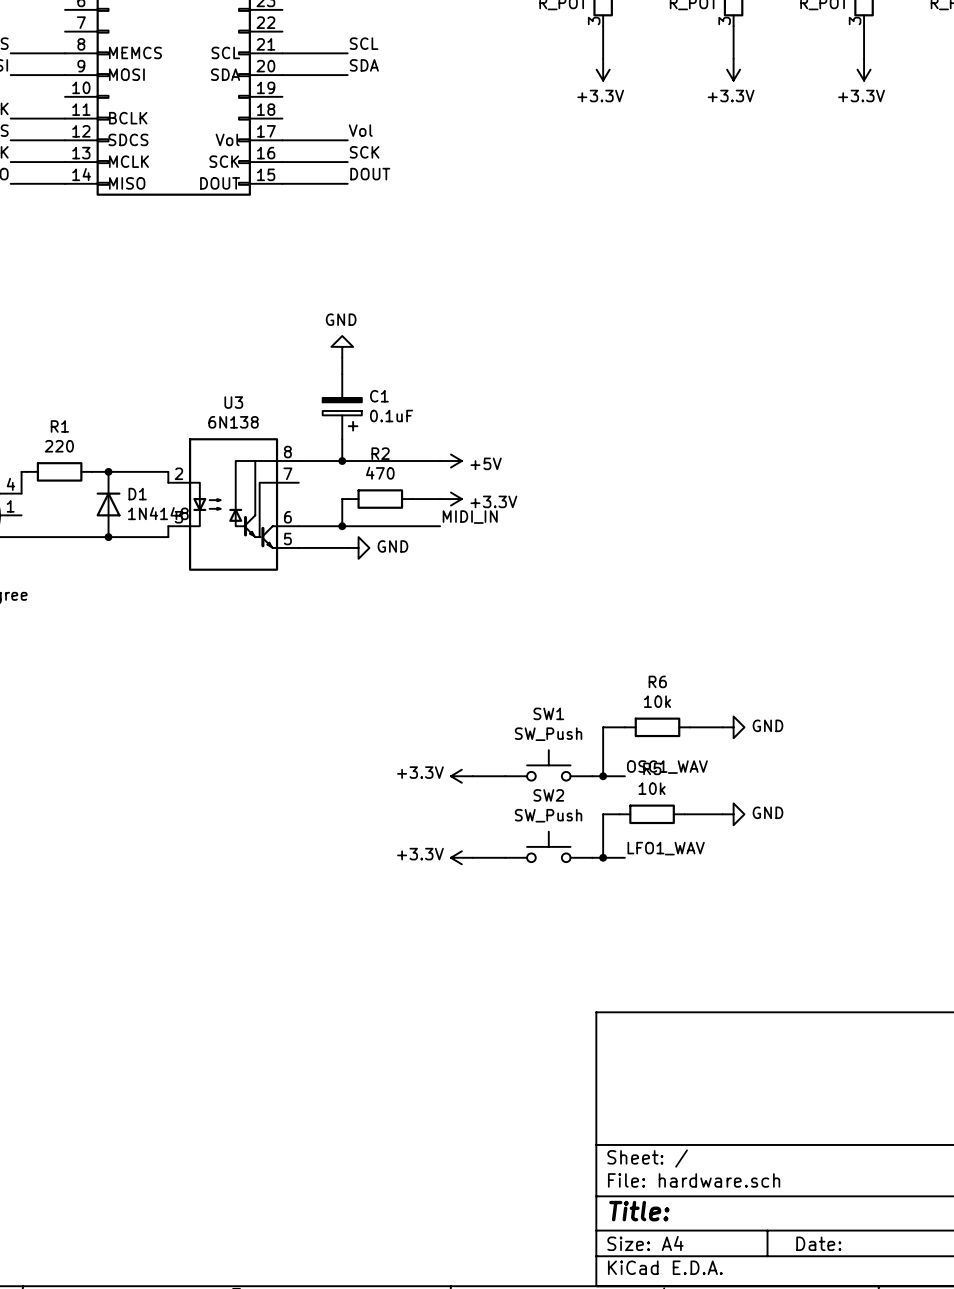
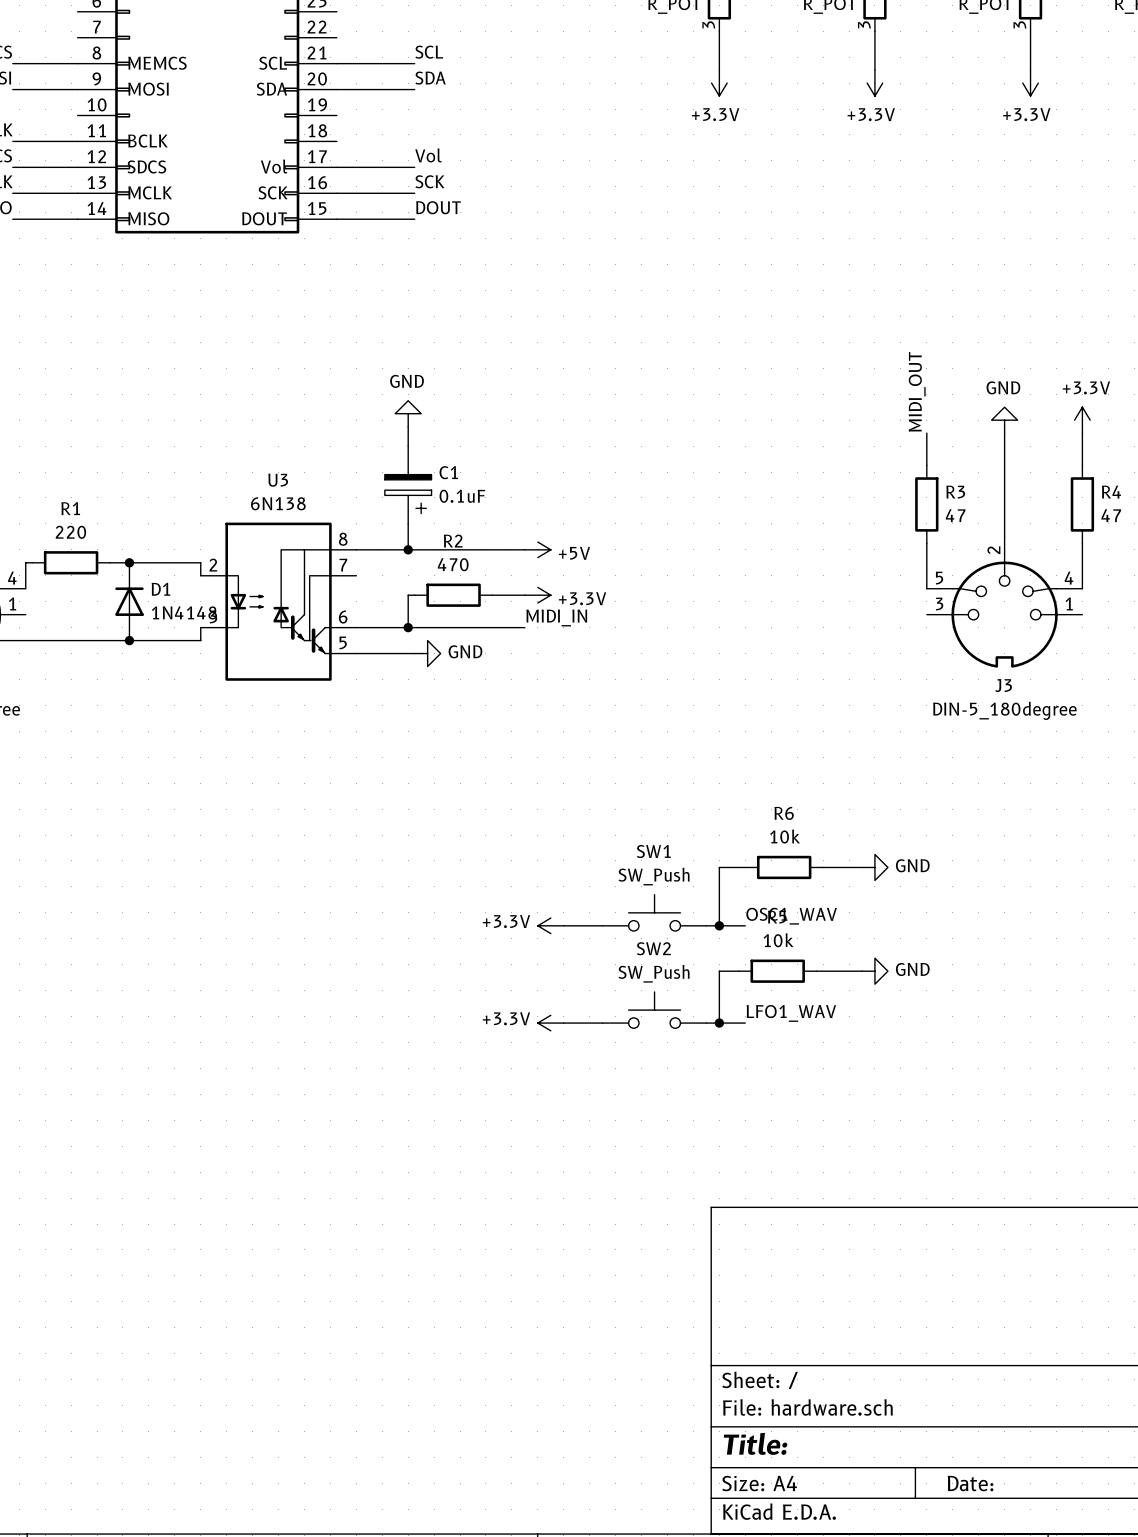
label: none -> MIDI_OUT (917, 391)
power symbol: none -> GND (1004, 420)
power symbol: none -> +3.3V (1082, 420)
wire: none -> (926, 433) (926, 465)
wire: none -> (1004, 433) (1004, 536)
wire: none -> (1082, 433) (1082, 465)
R3: none -> 47 (926, 504)
R4: none -> 47 (1082, 504)
wire: none -> (926, 543) (926, 588)
wire: none -> (1082, 543) (1082, 588)
J3: none -> DIN-5_180degree (1004, 602)

